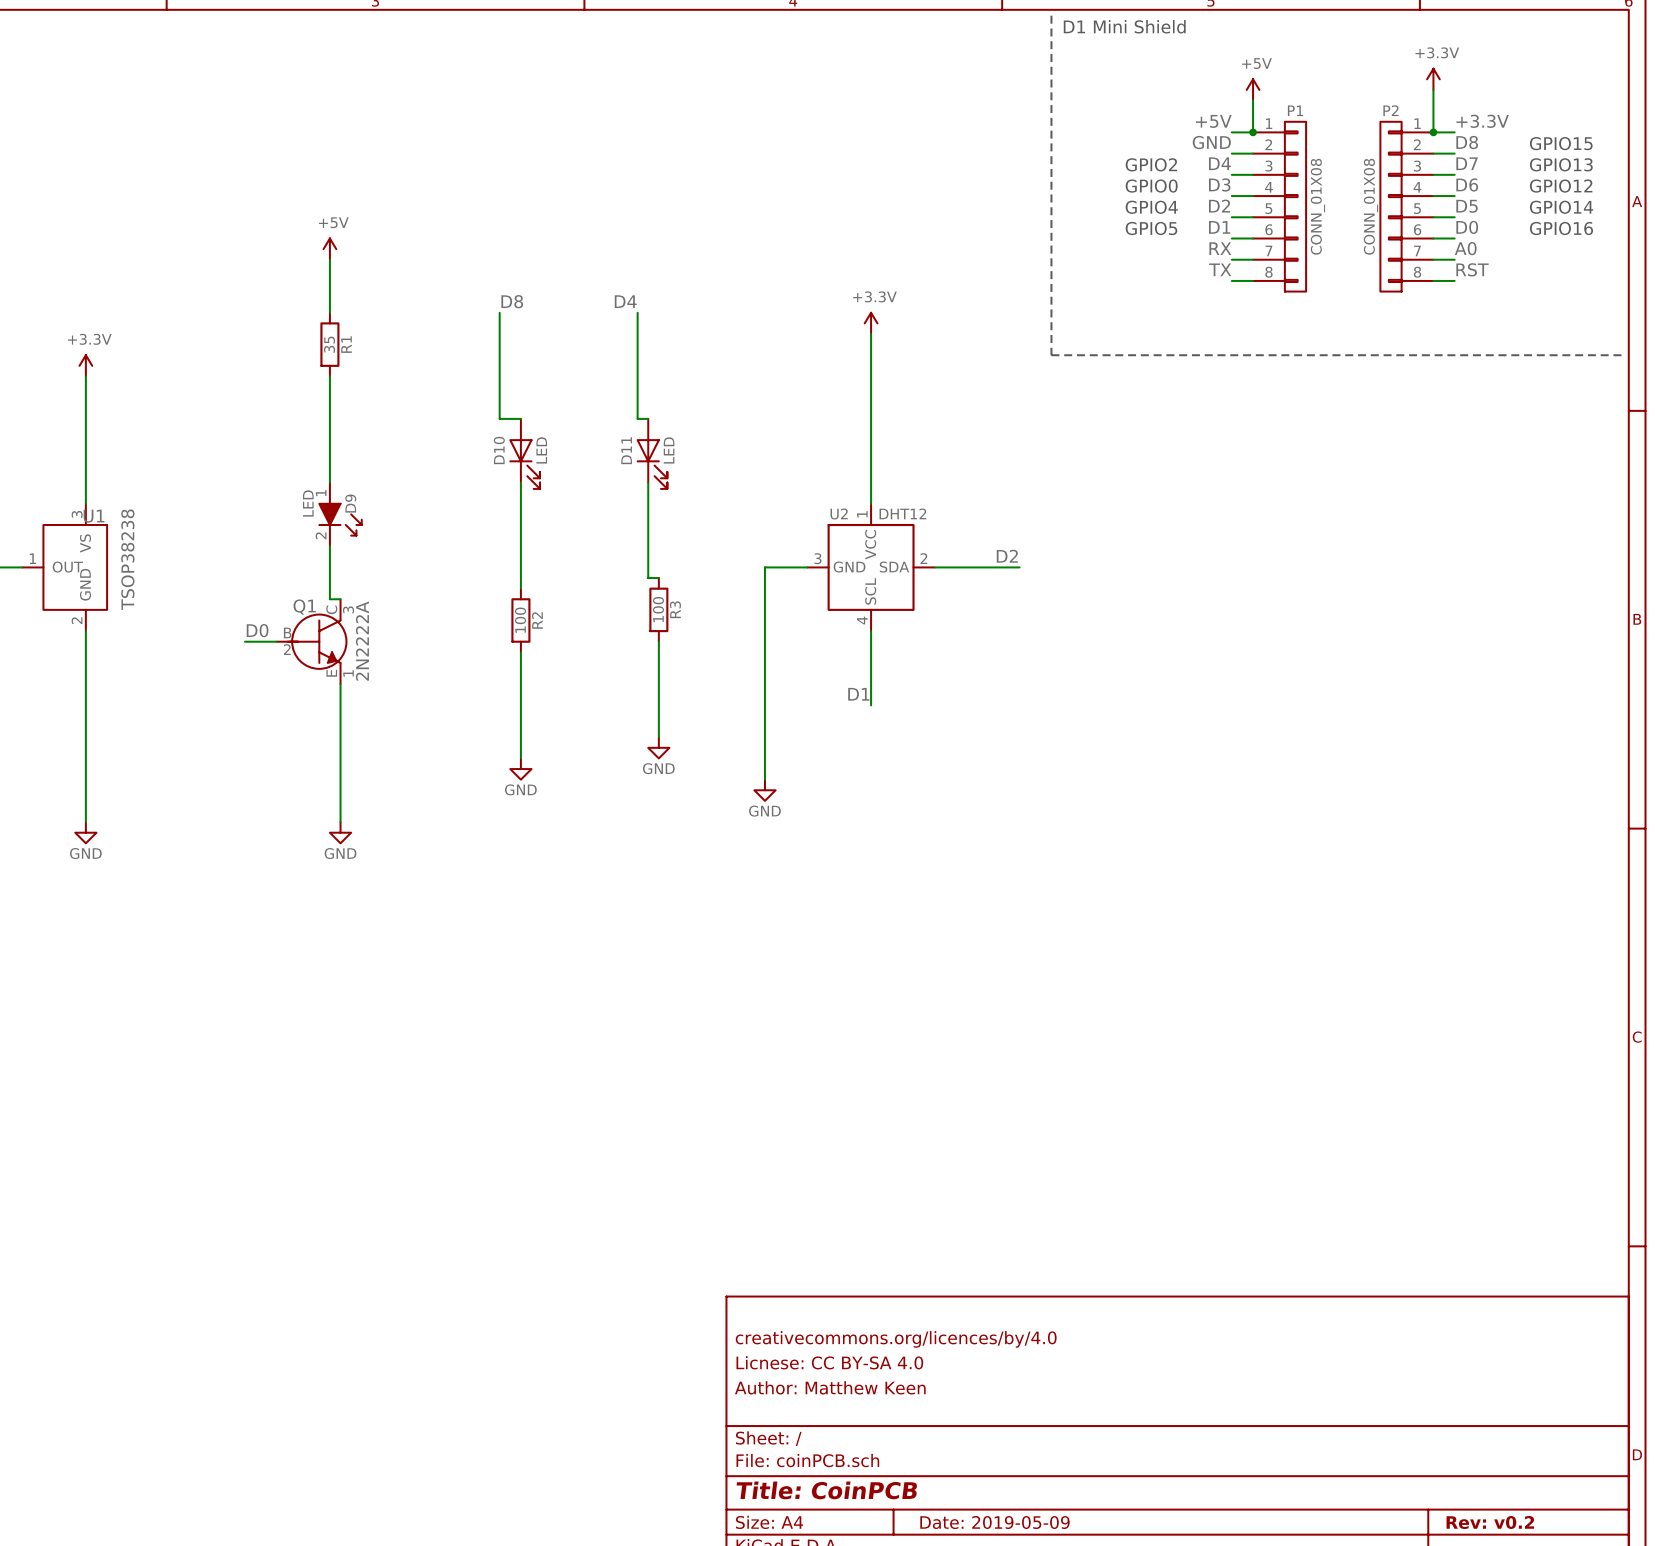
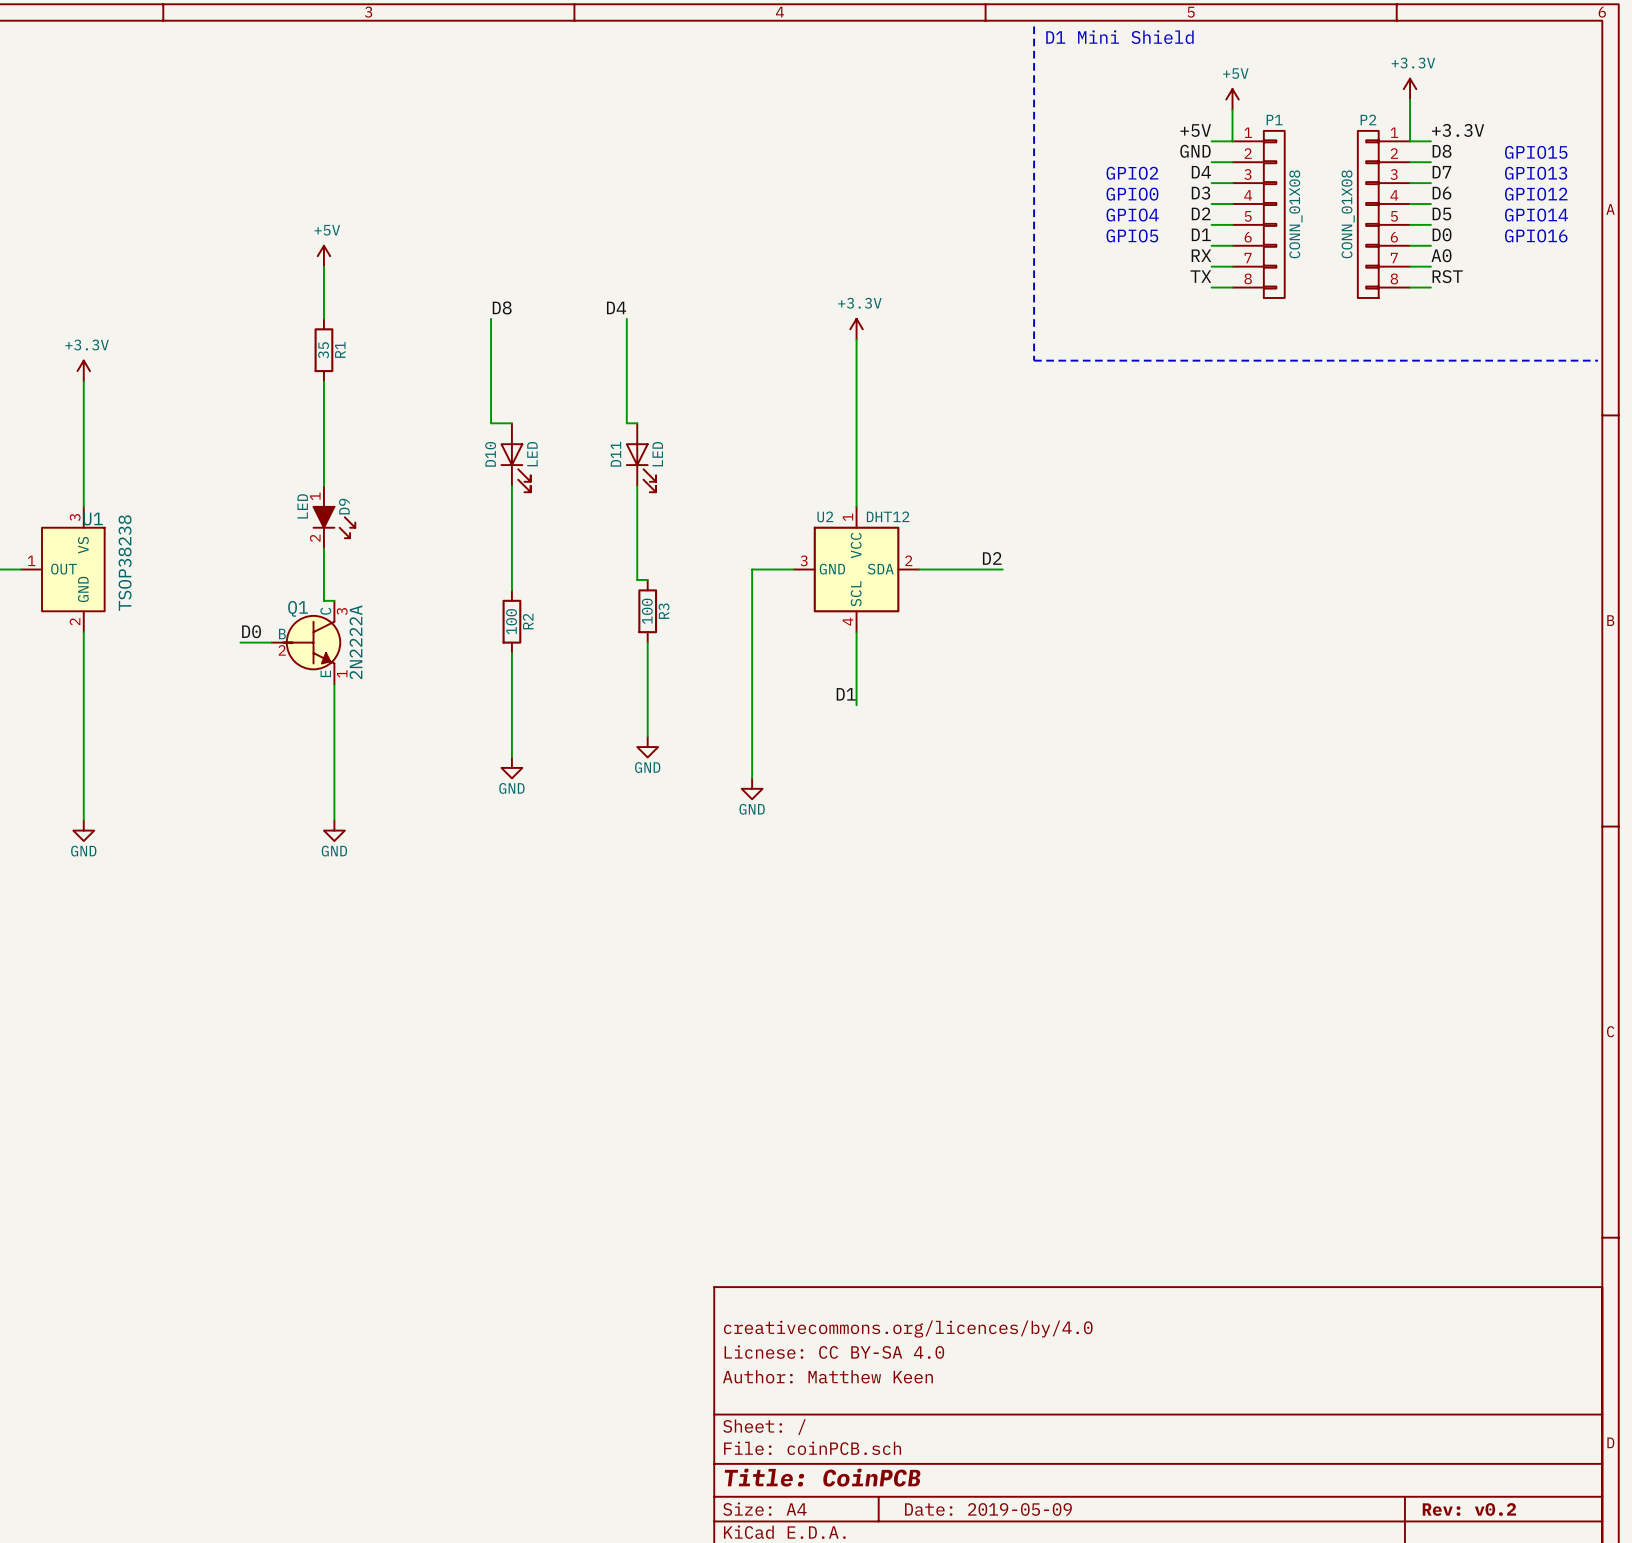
junction: (1253, 132) -> none
junction: (1433, 132) -> none

